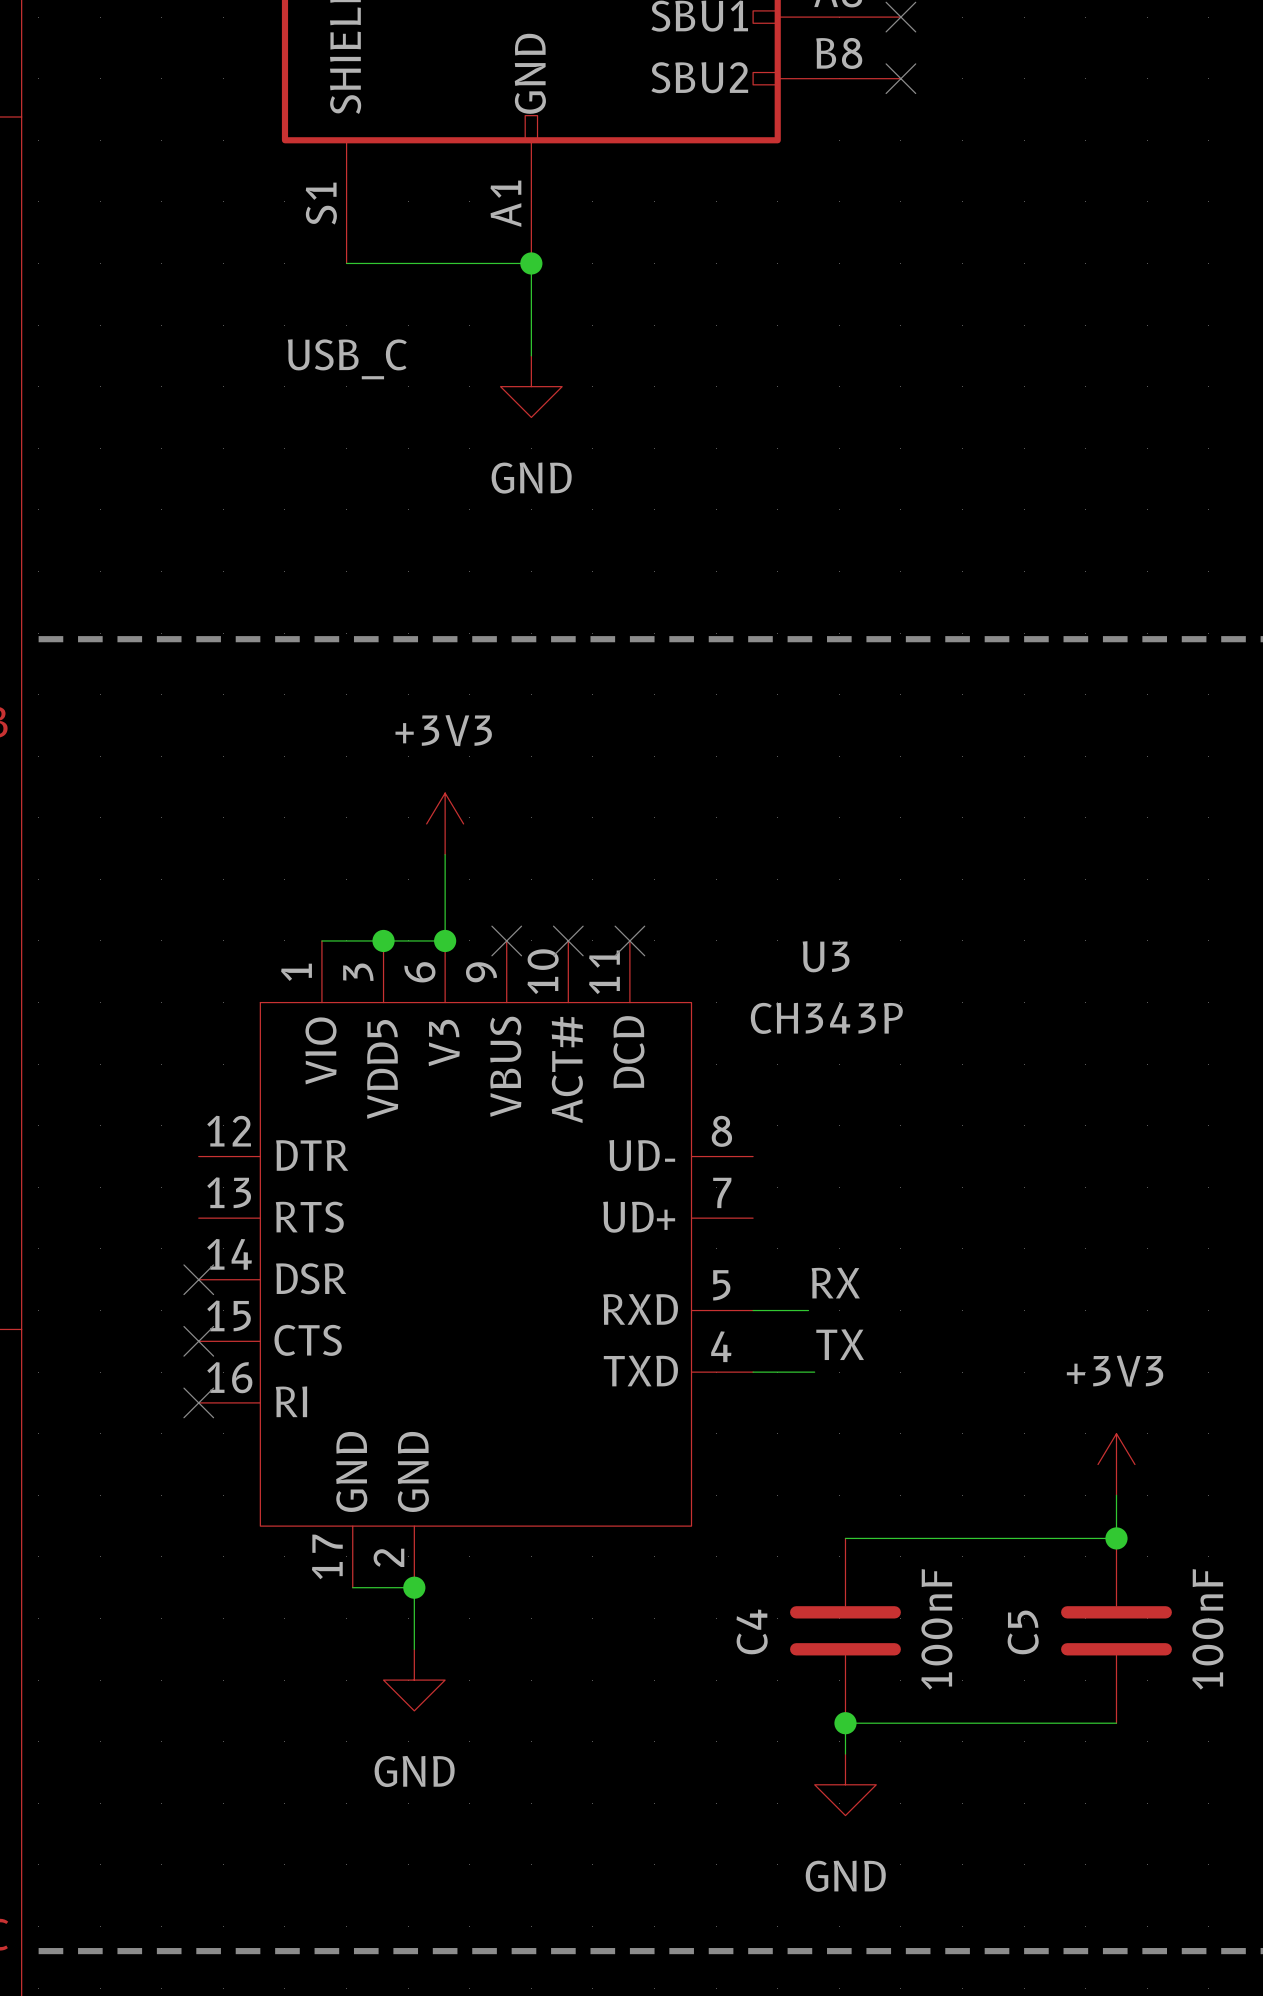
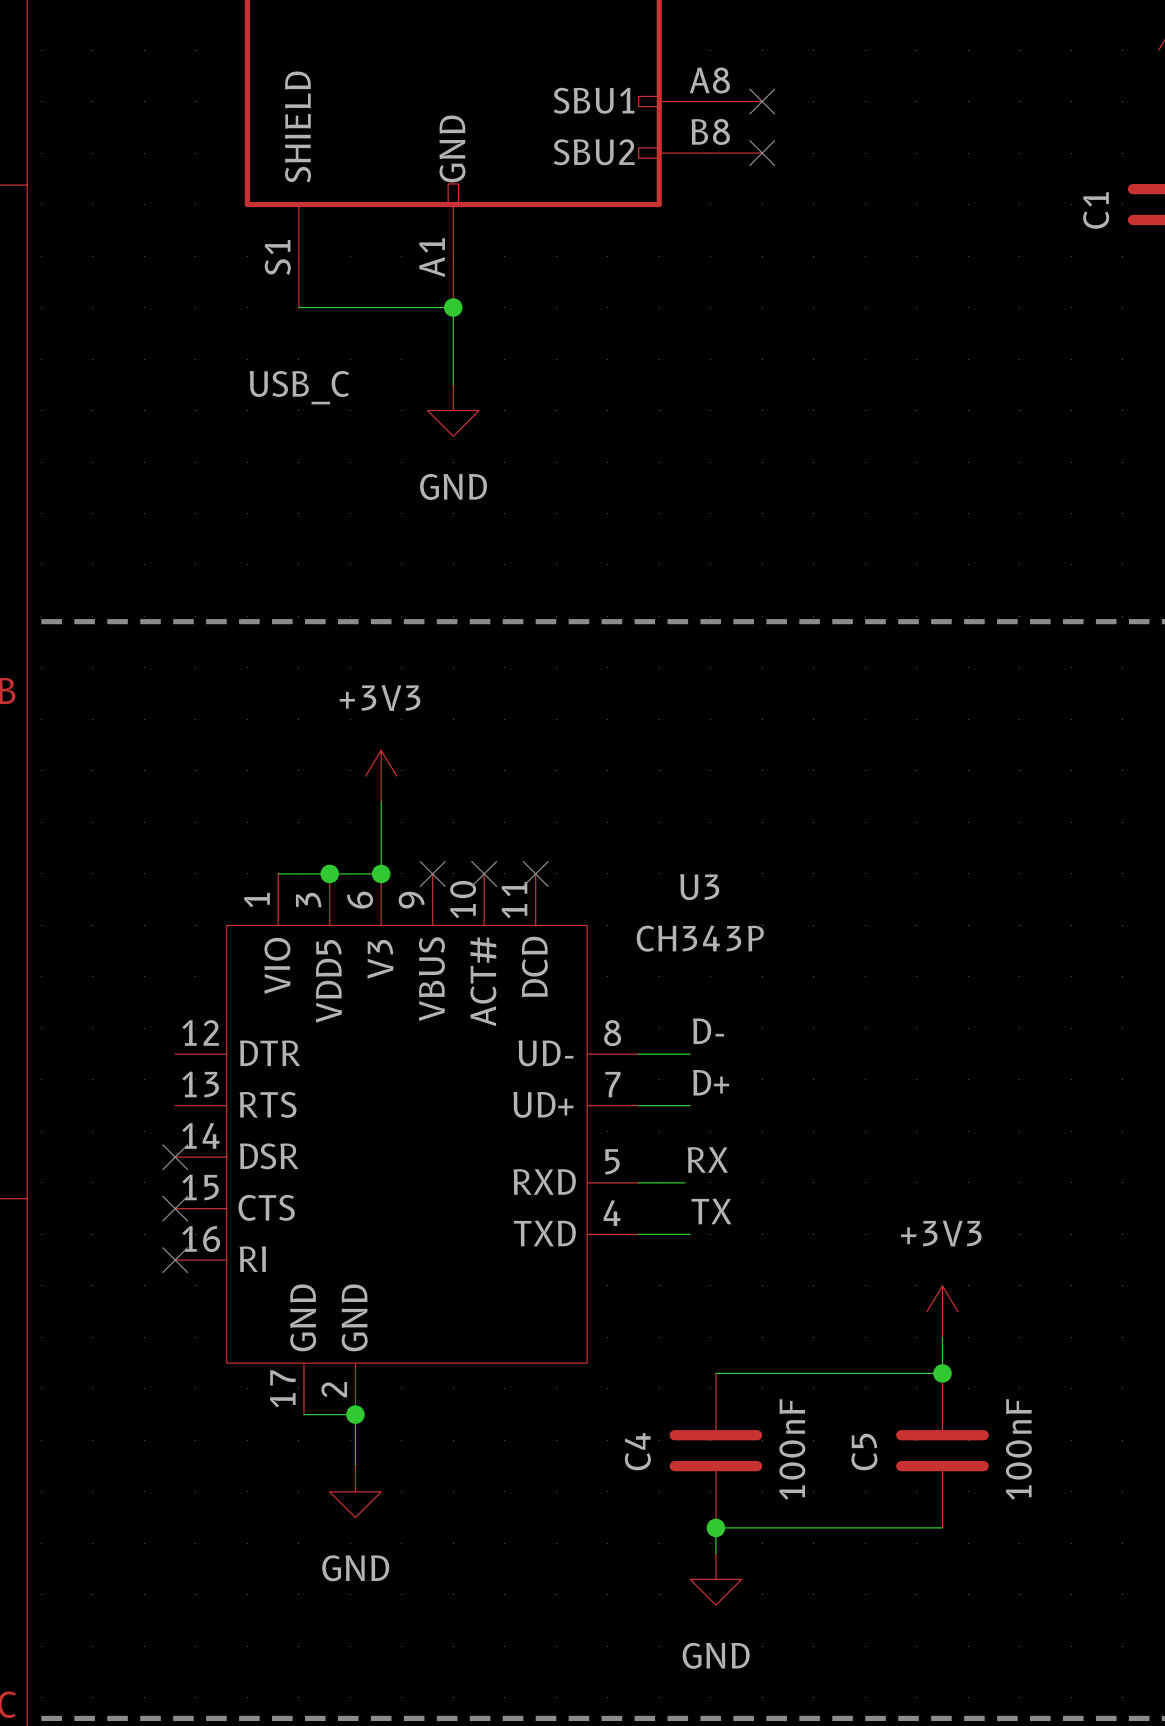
label: none -> D- (708, 1031)
wire: none -> (638, 1054) (690, 1054)
label: none -> D+ (711, 1082)
wire: none -> (638, 1105) (690, 1105)

